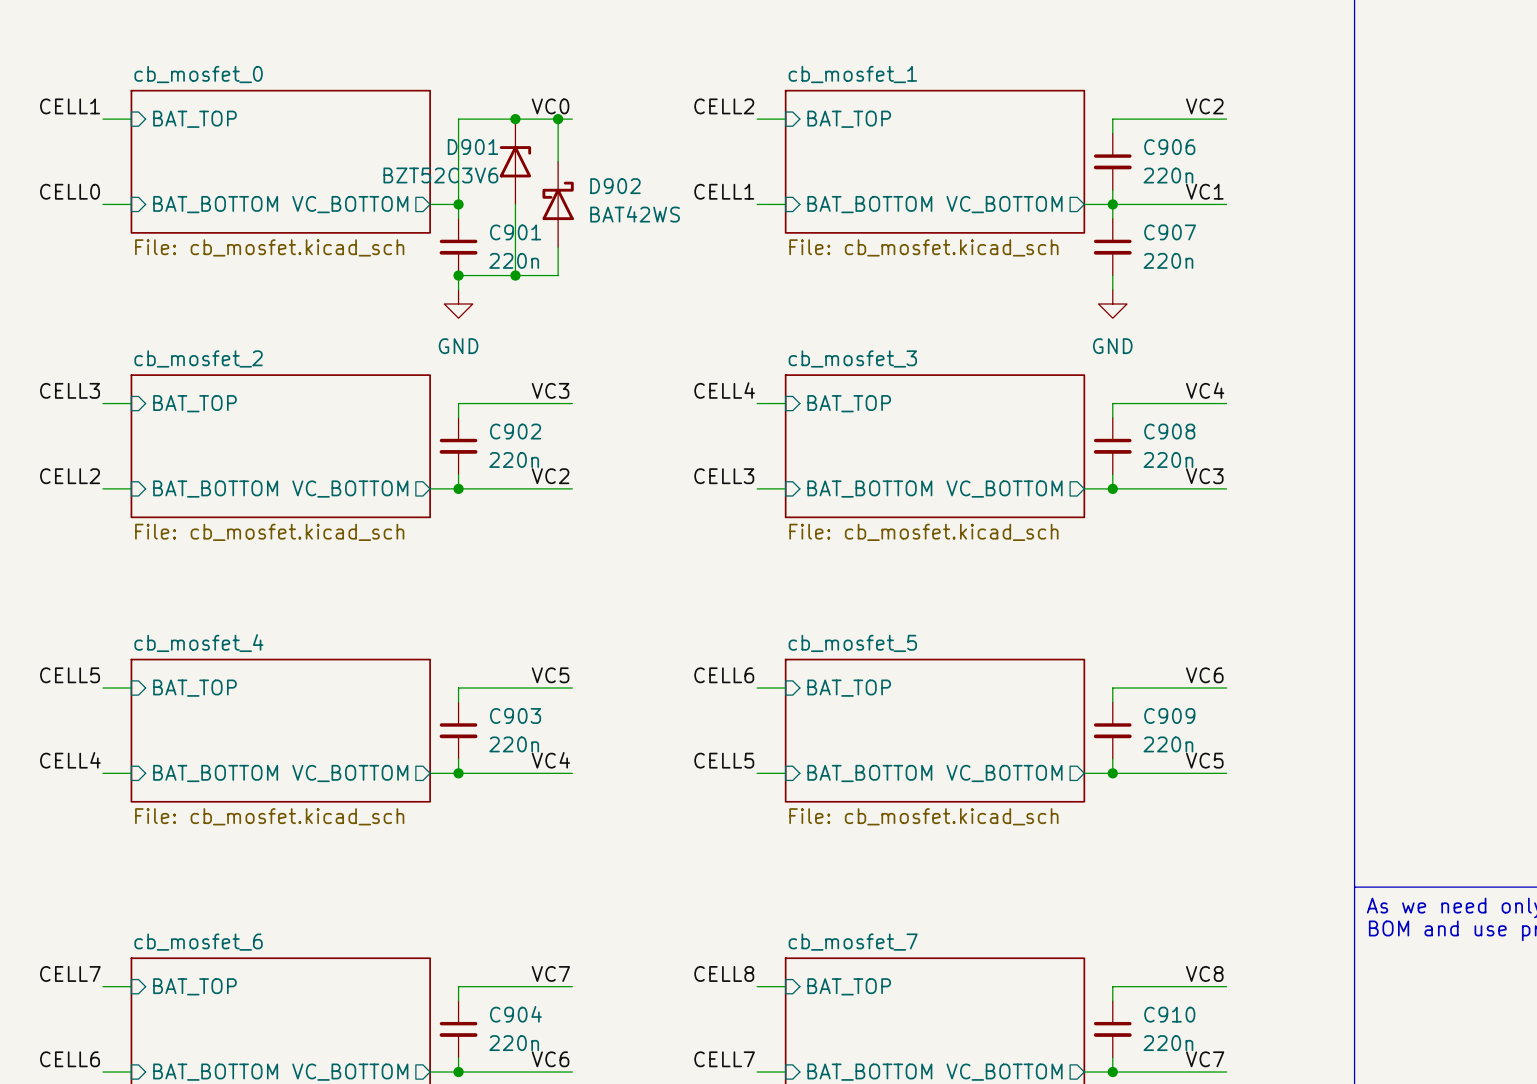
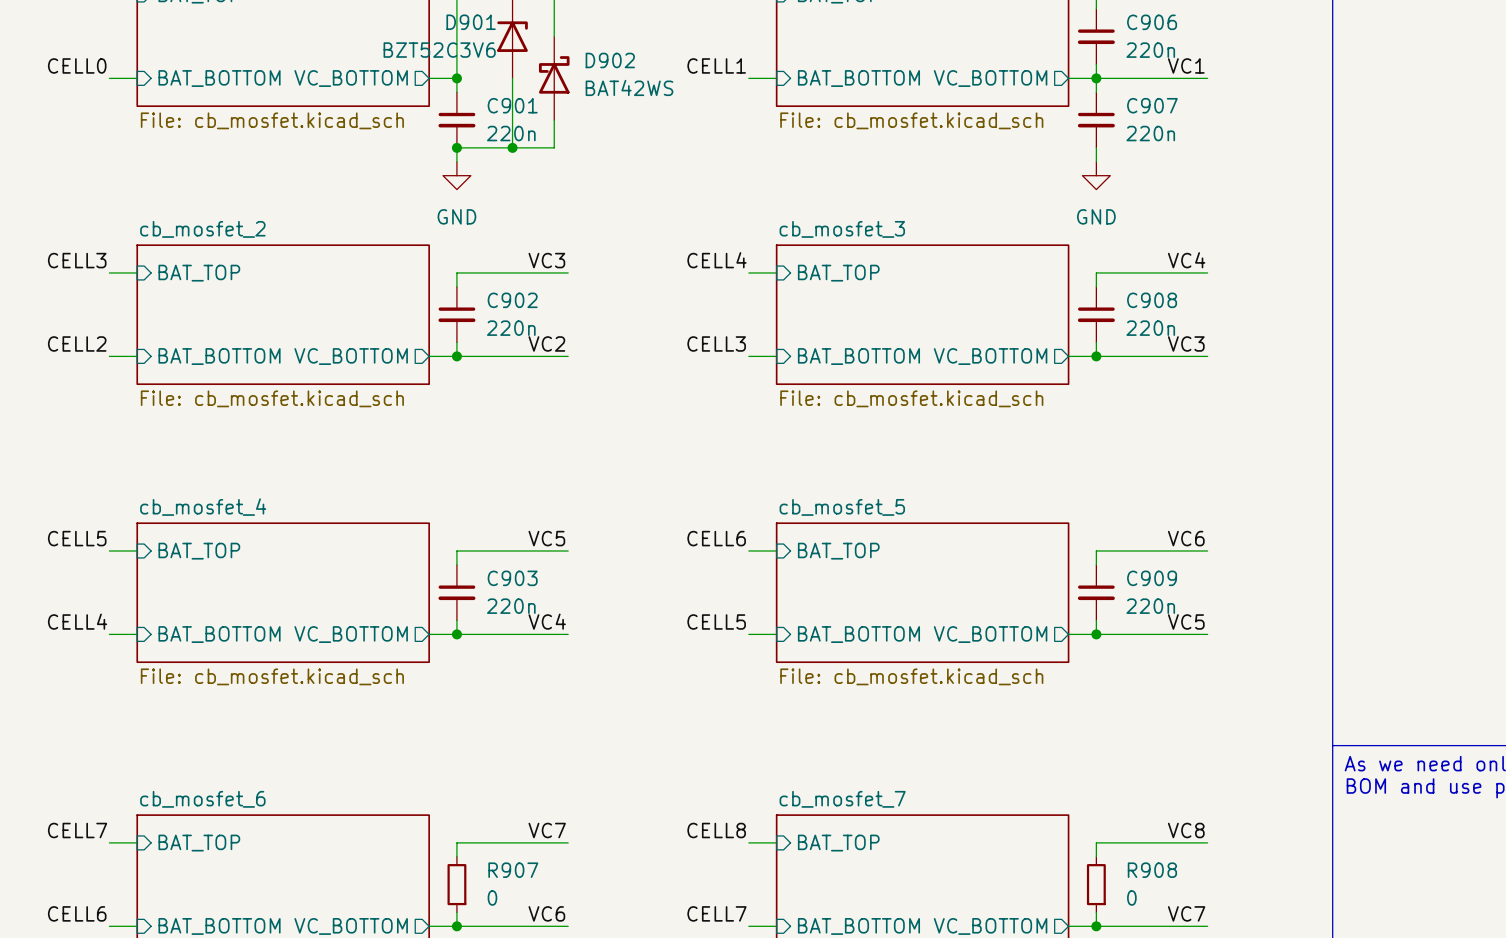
C904: 220n (458, 1029) -> none
R907: none -> 0 (456, 884)
C910: 220n (1112, 1029) -> none
R908: none -> 0 (1096, 884)

